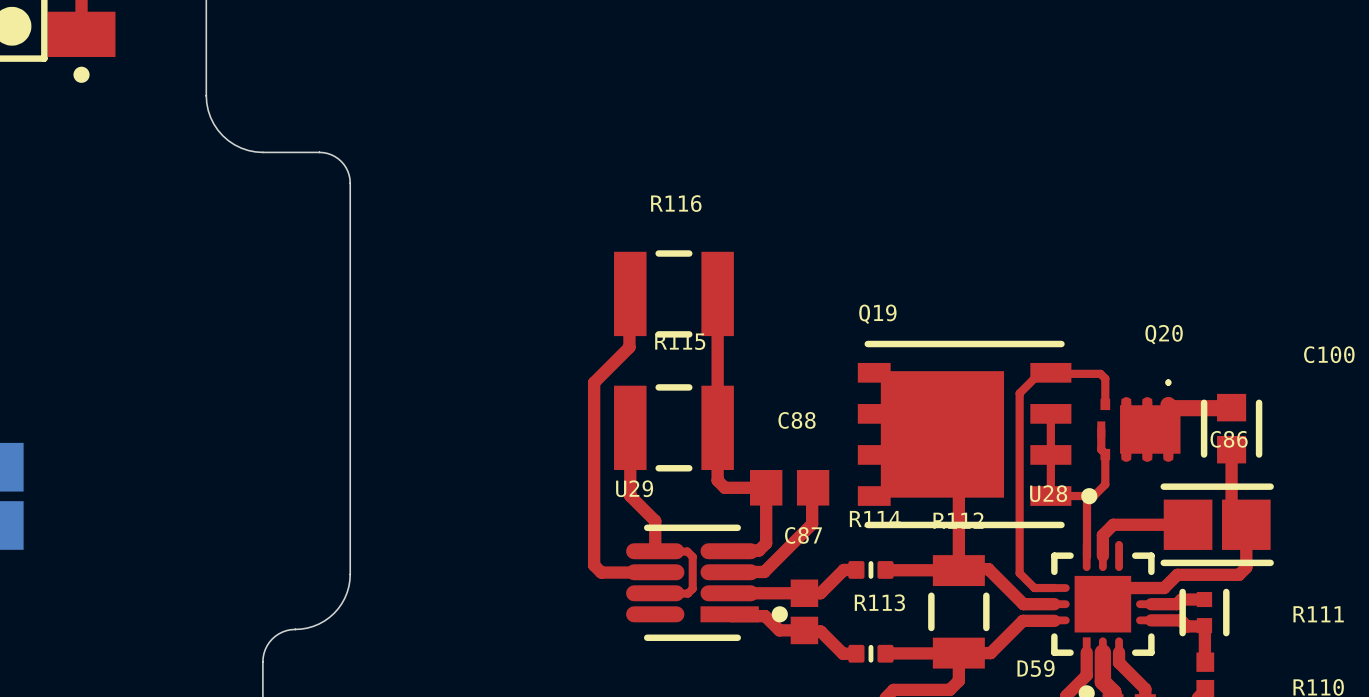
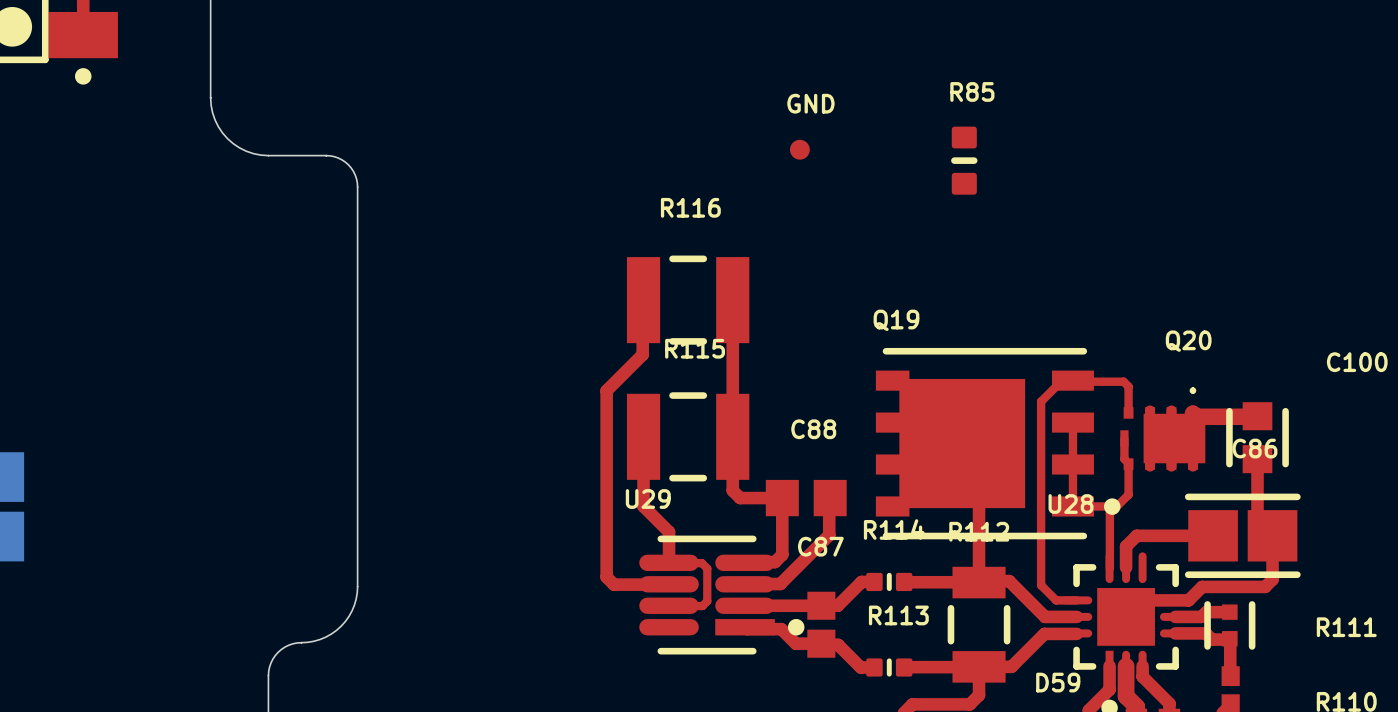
GND: none -> (799, 149)
R85: none -> (964, 160)

